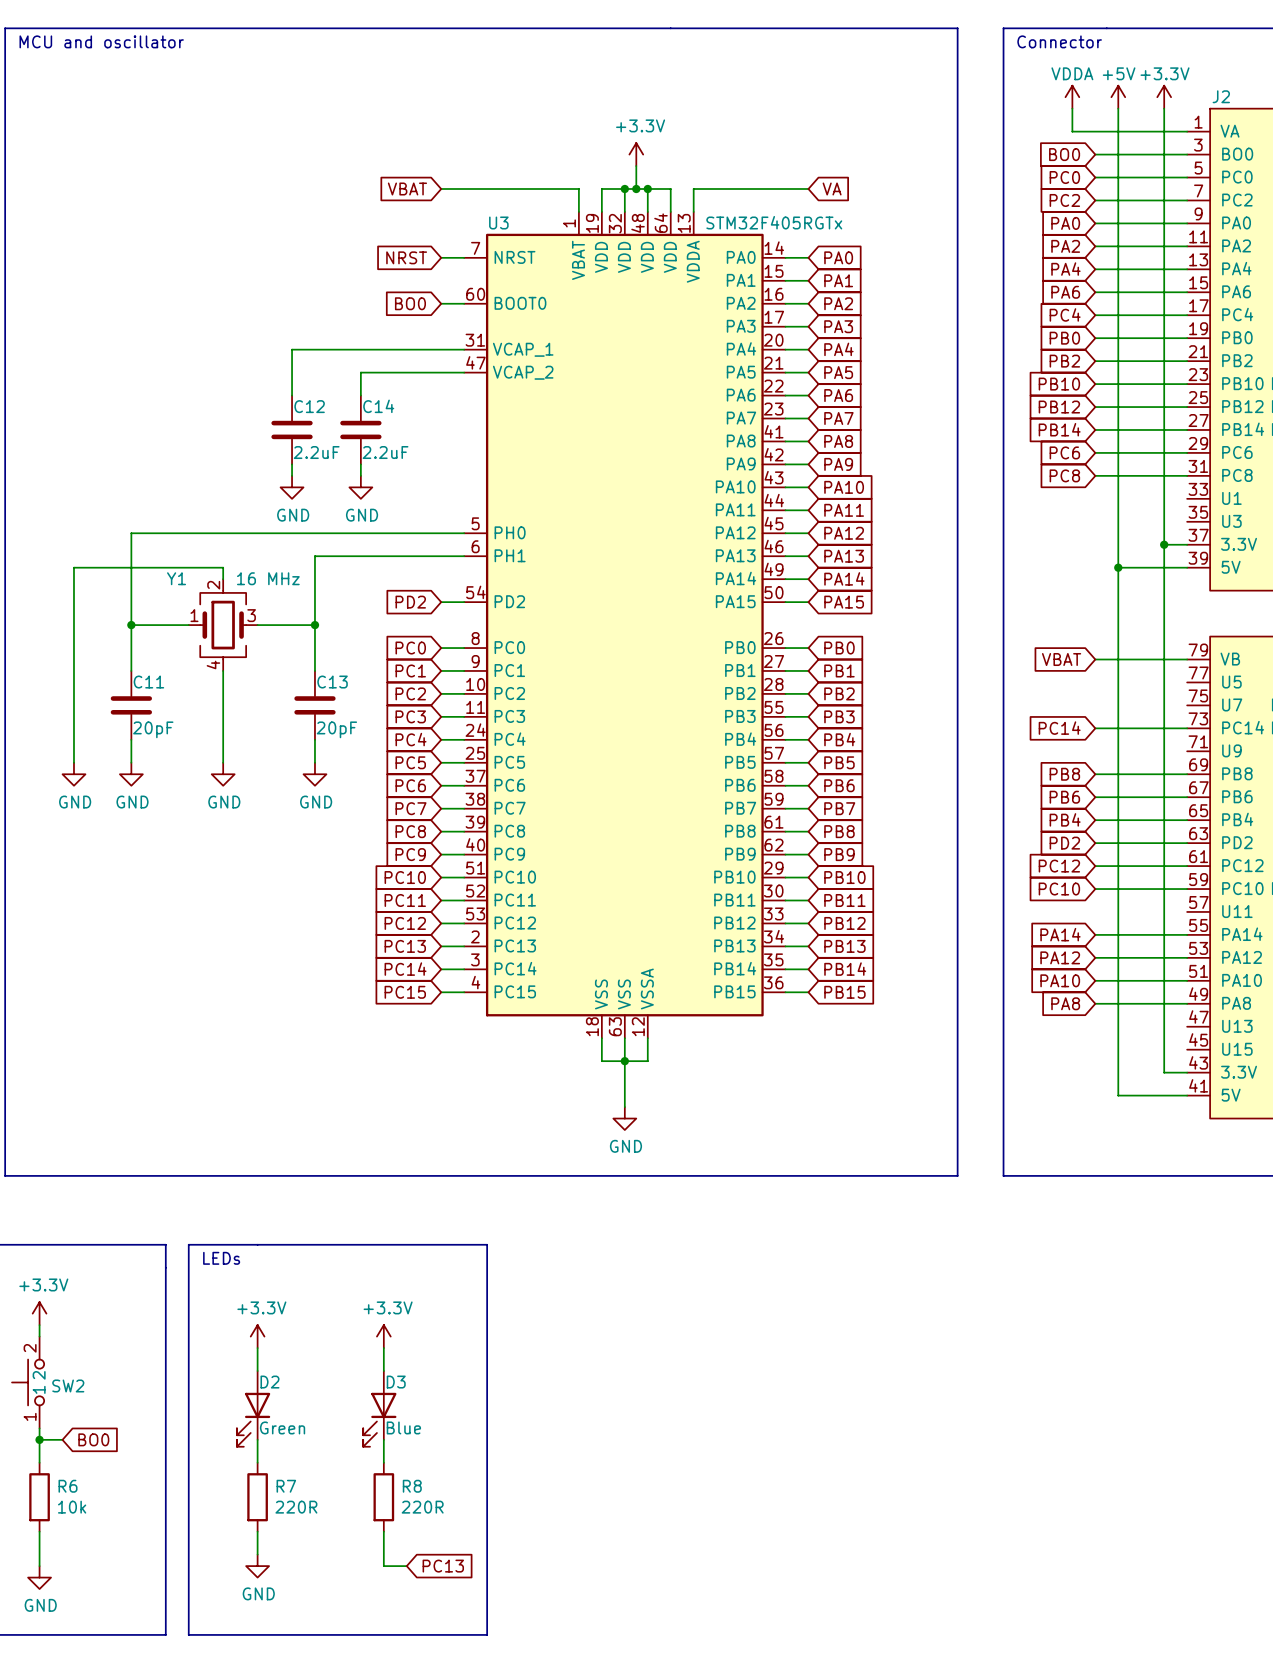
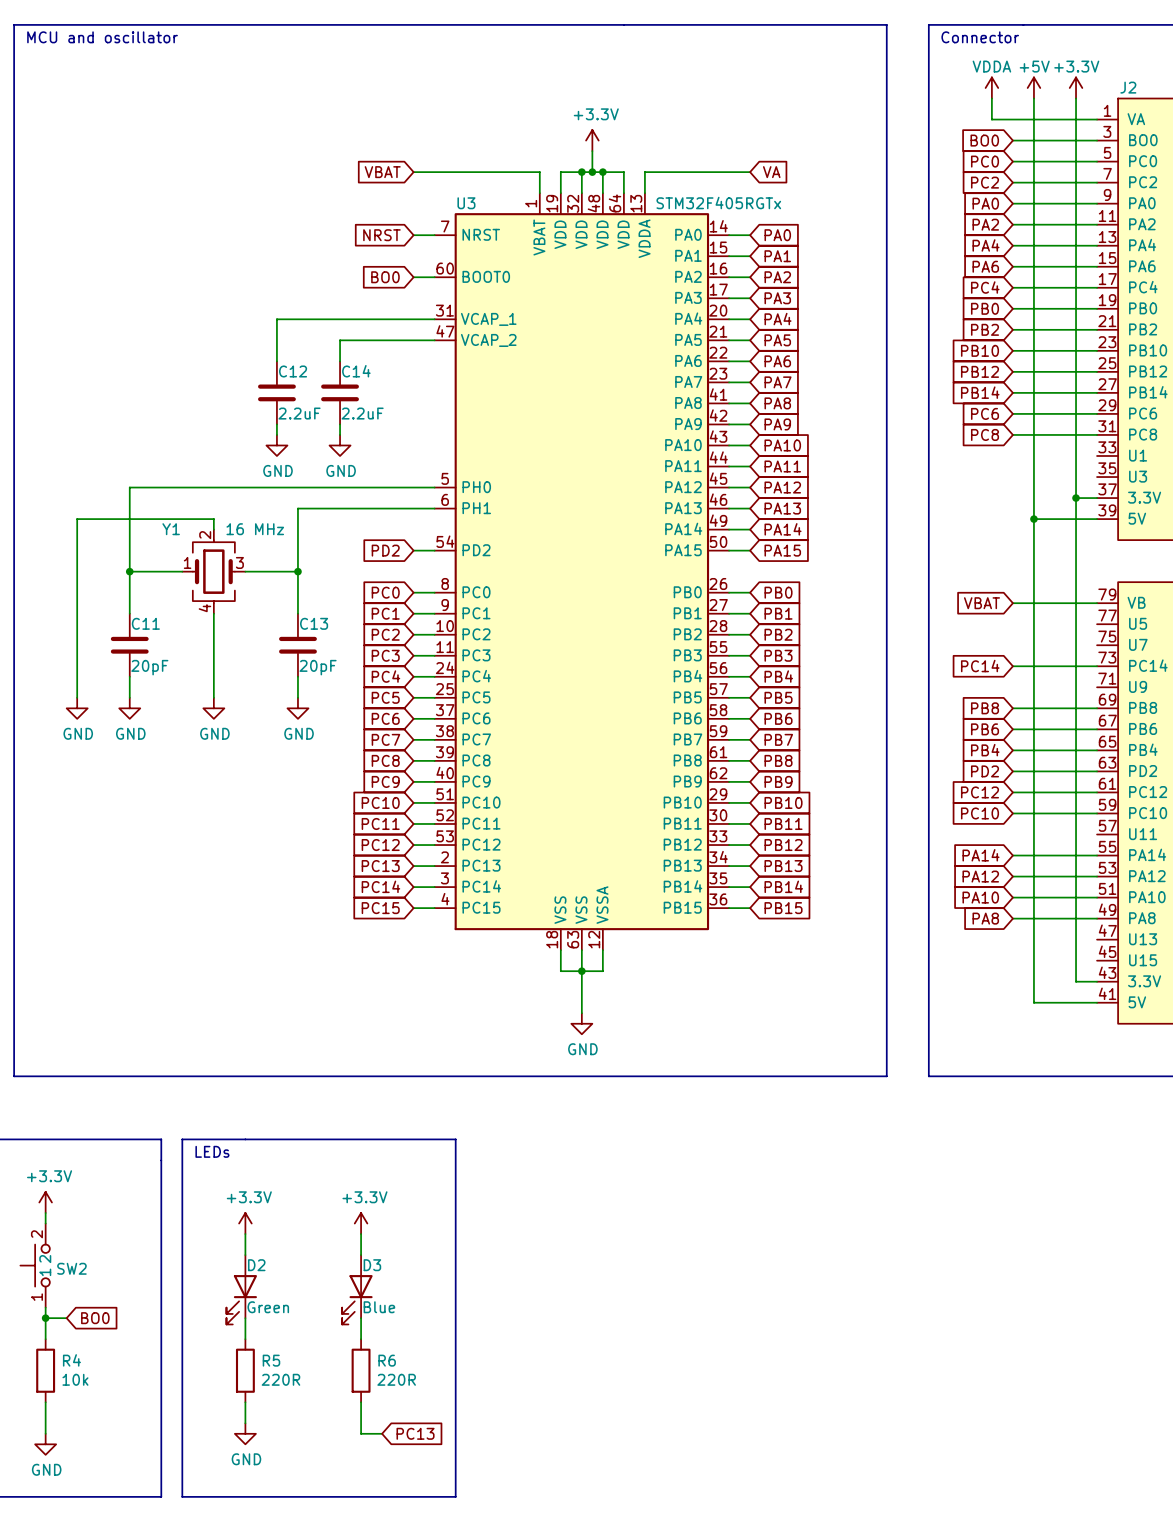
R6 name: R6 (68, 1486) -> R4 (71, 1360)
R7 name: R7 (286, 1486) -> R5 (271, 1360)
R8 name: R8 (412, 1486) -> R6 (387, 1360)

